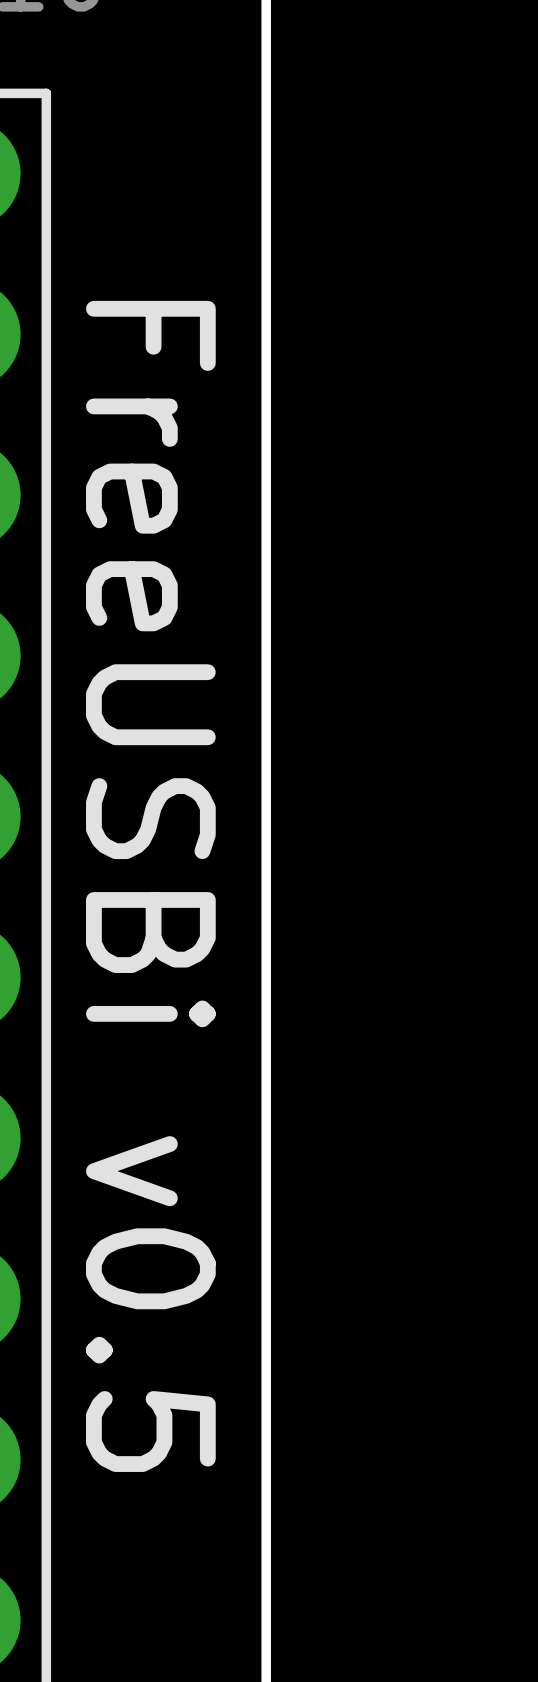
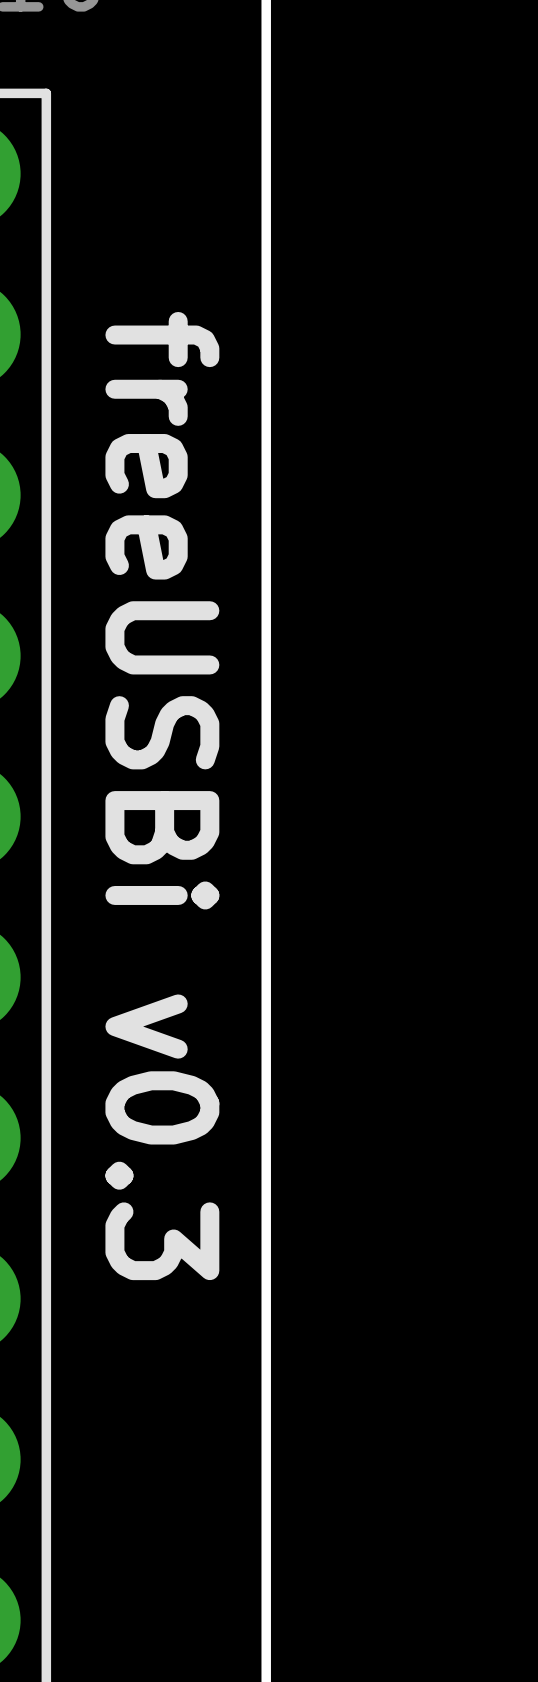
text: FreeUSBi v0.5 (150, 886) -> freeUSBi v0.3 (162, 796)

